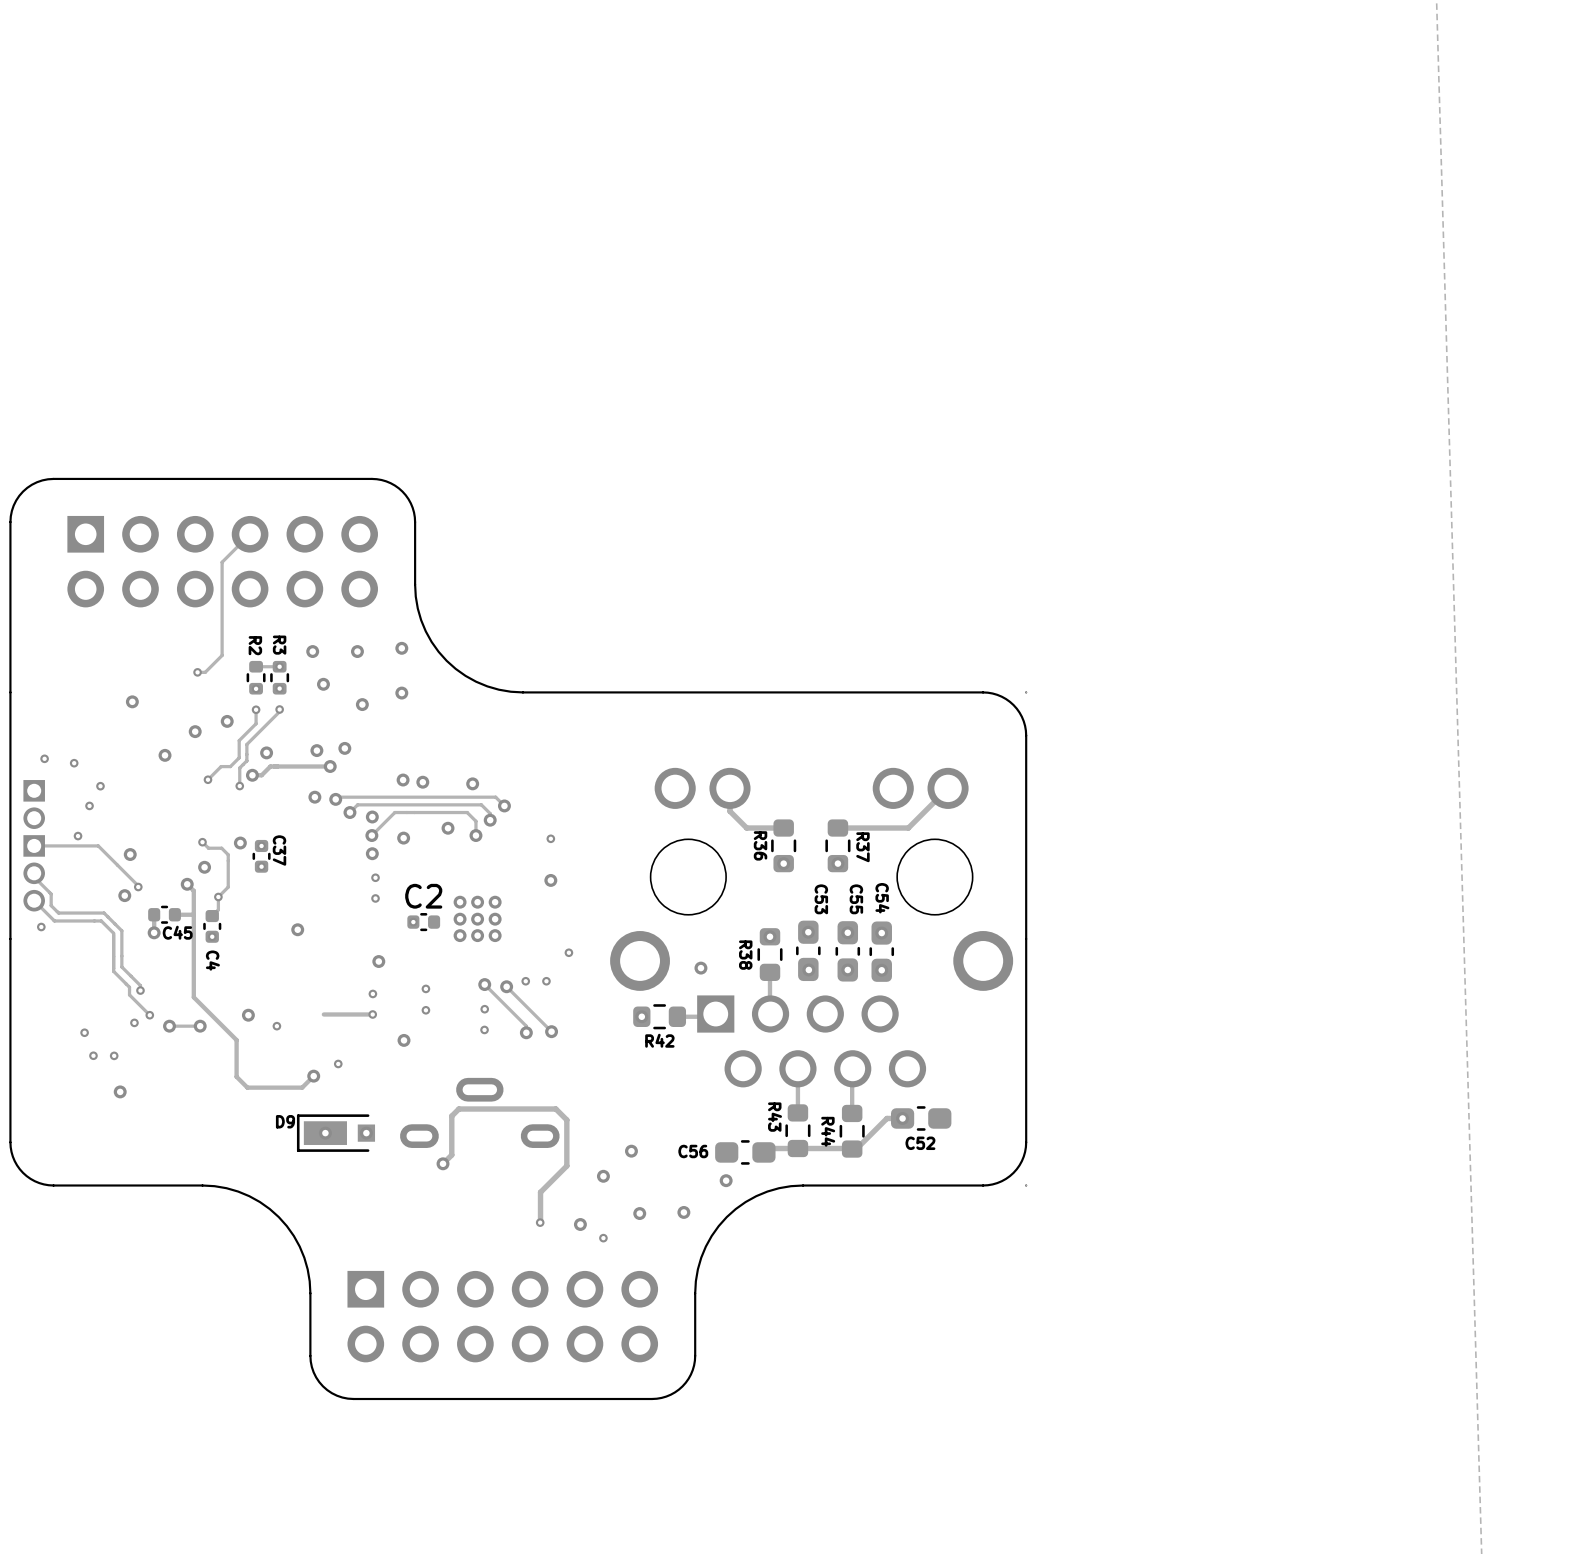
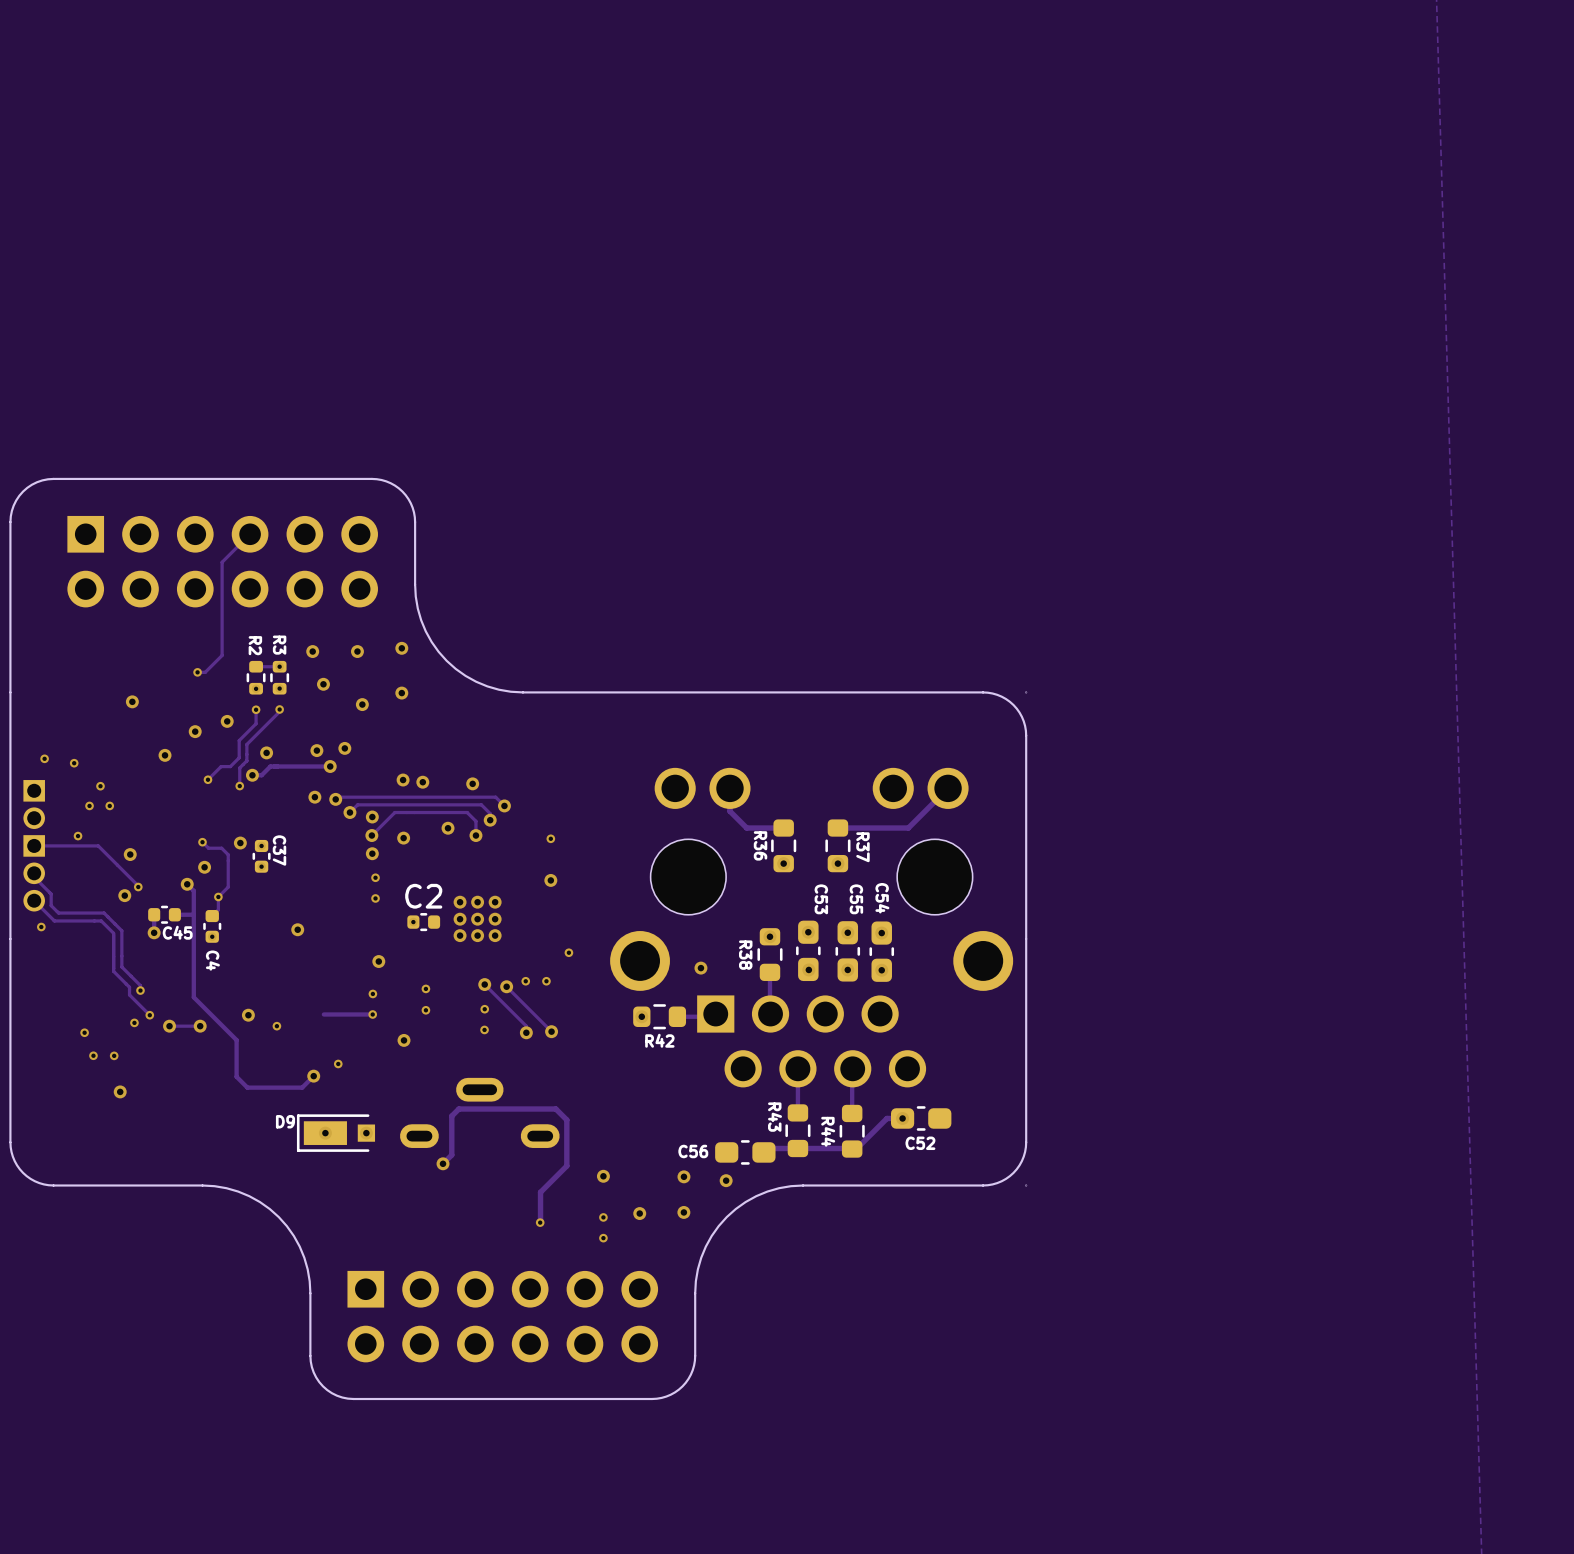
via: none -> (109, 805)
via: (631, 1151) -> none
via: none -> (683, 1176)
via: none -> (603, 1217)
via: (580, 1224) -> none

